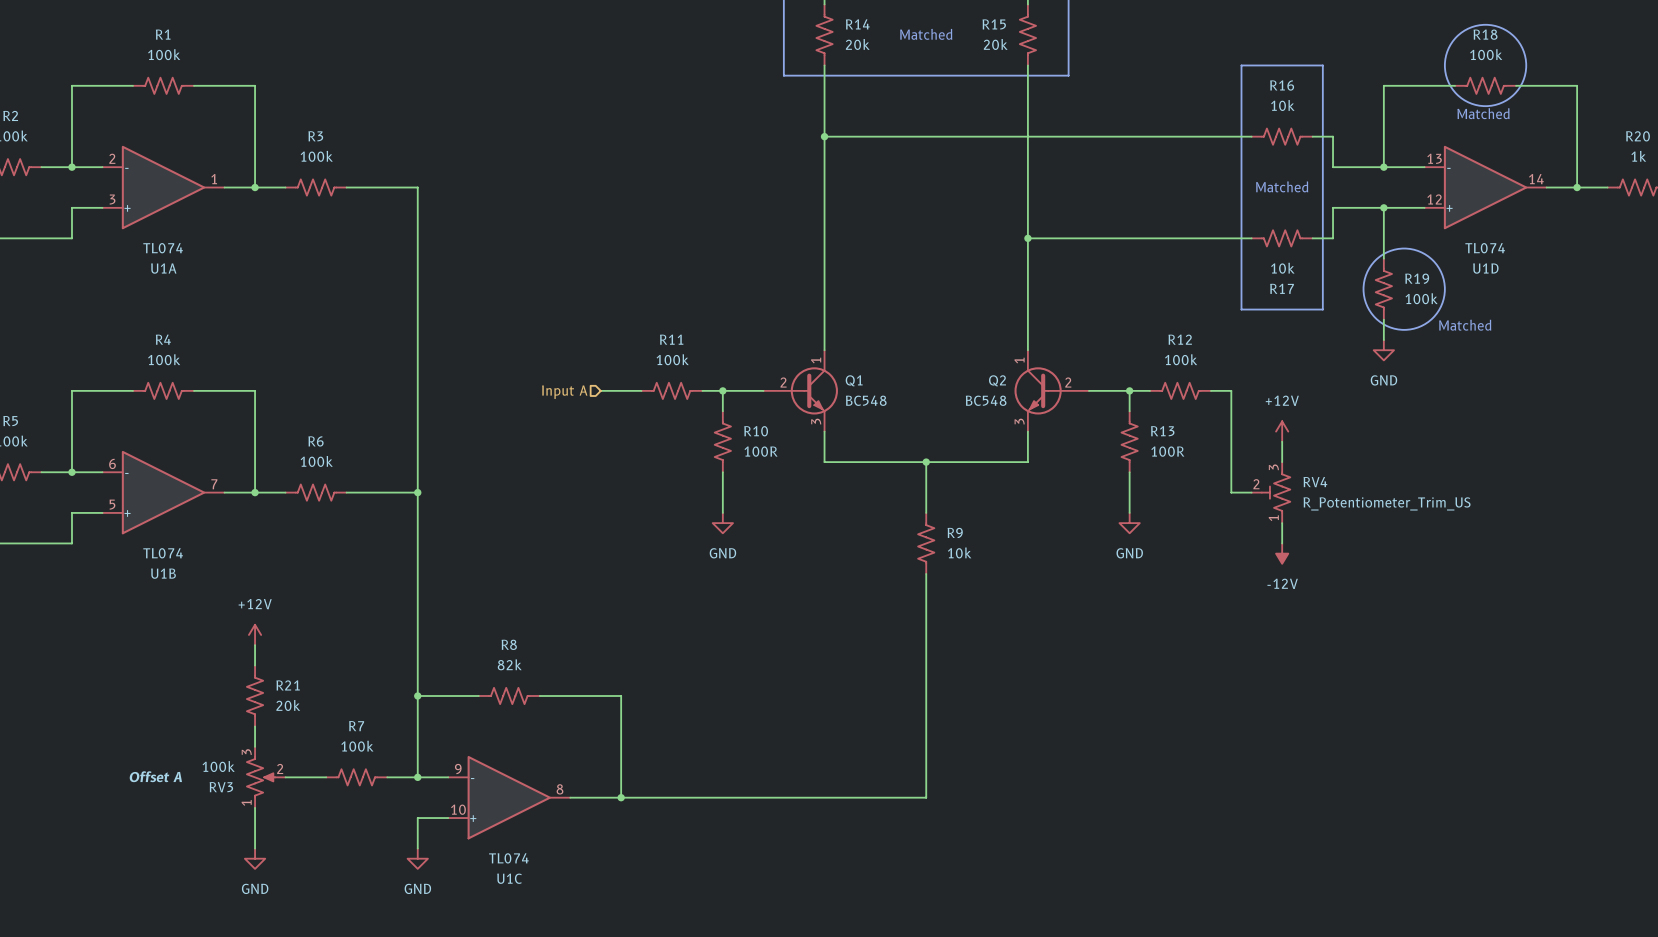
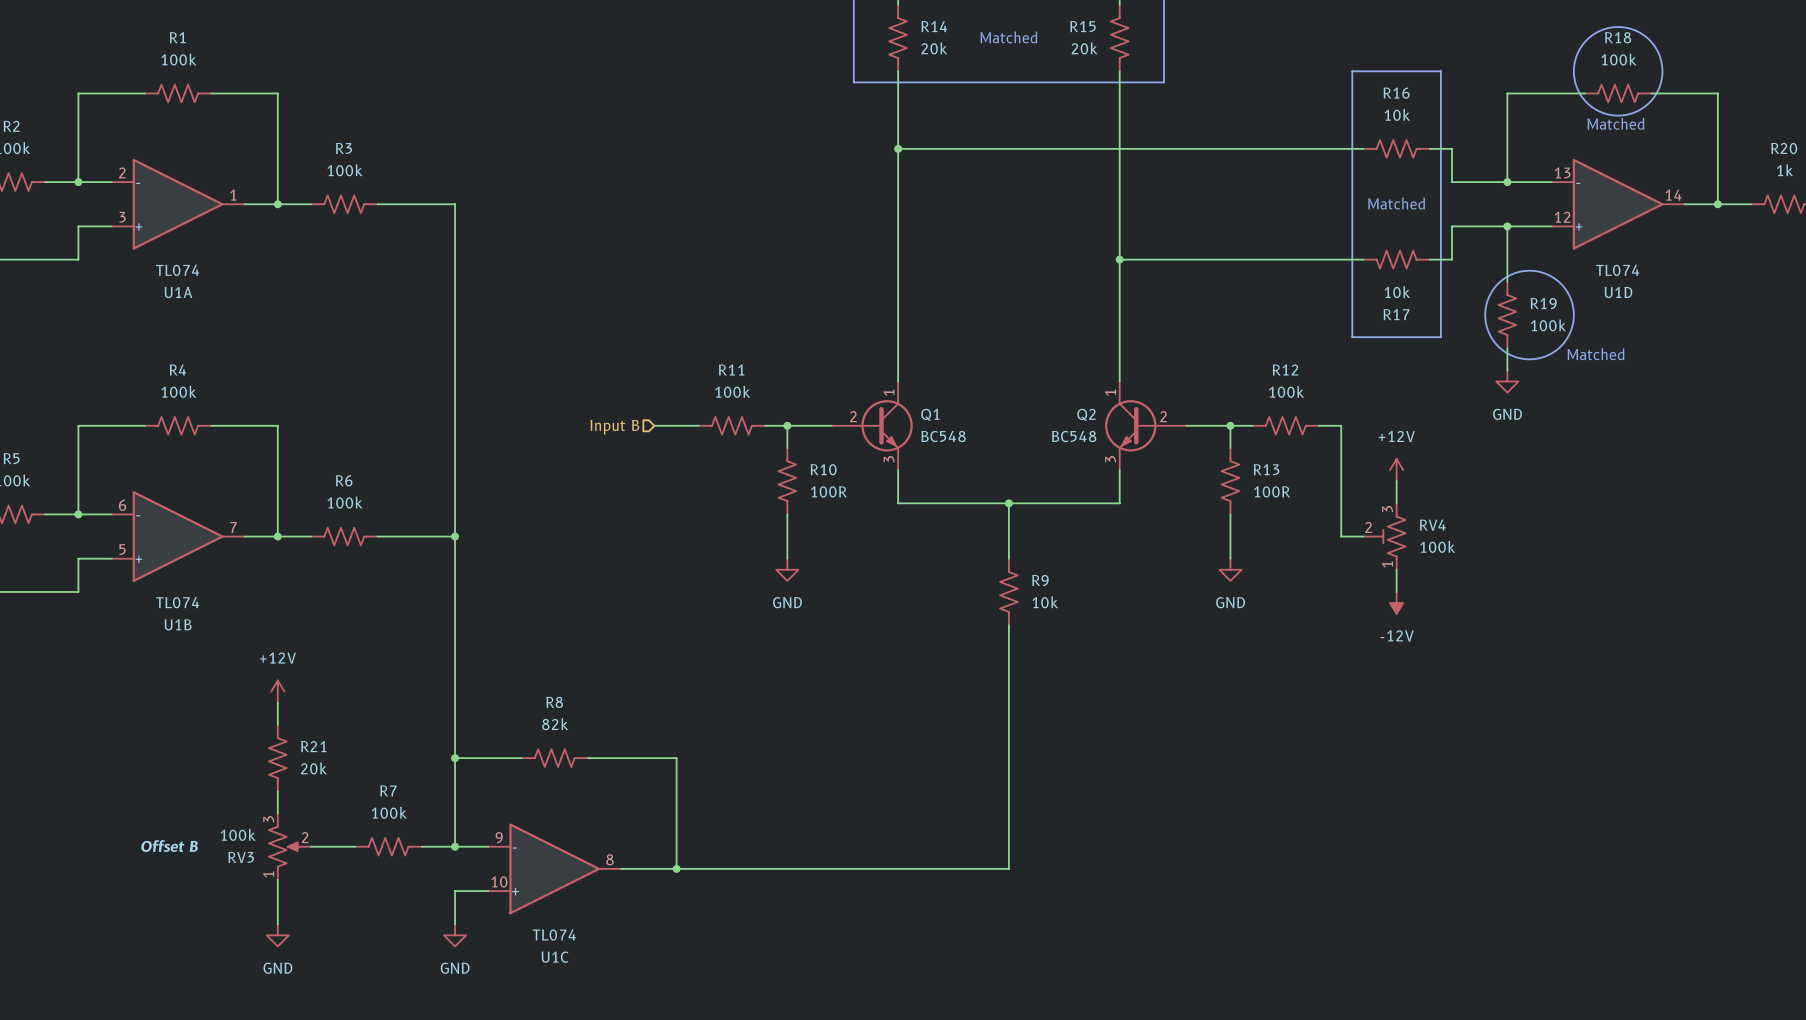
hierarchical label: Input A (564, 392) -> Input B (614, 427)
RV4 value: R_Potentiometer_Trim_US (1387, 503) -> 100k (1437, 546)
RV3 text: Offset A (155, 776) -> Offset B (169, 846)

